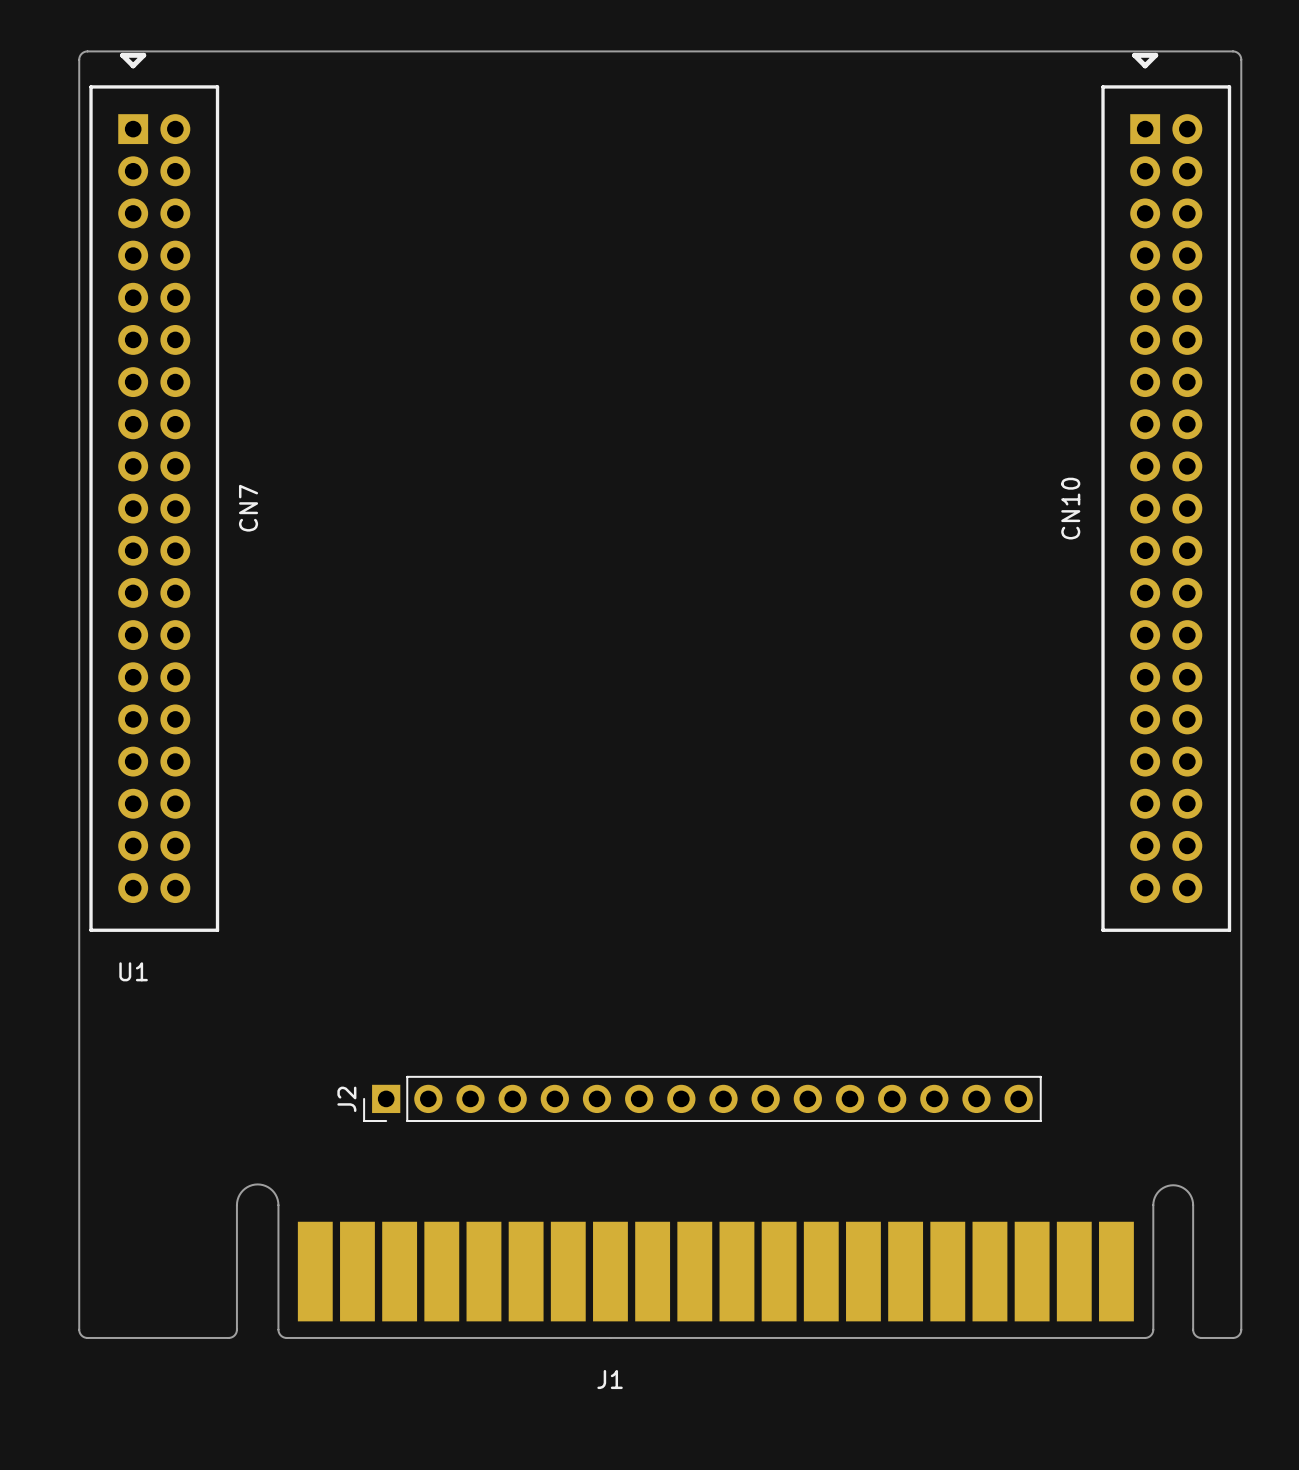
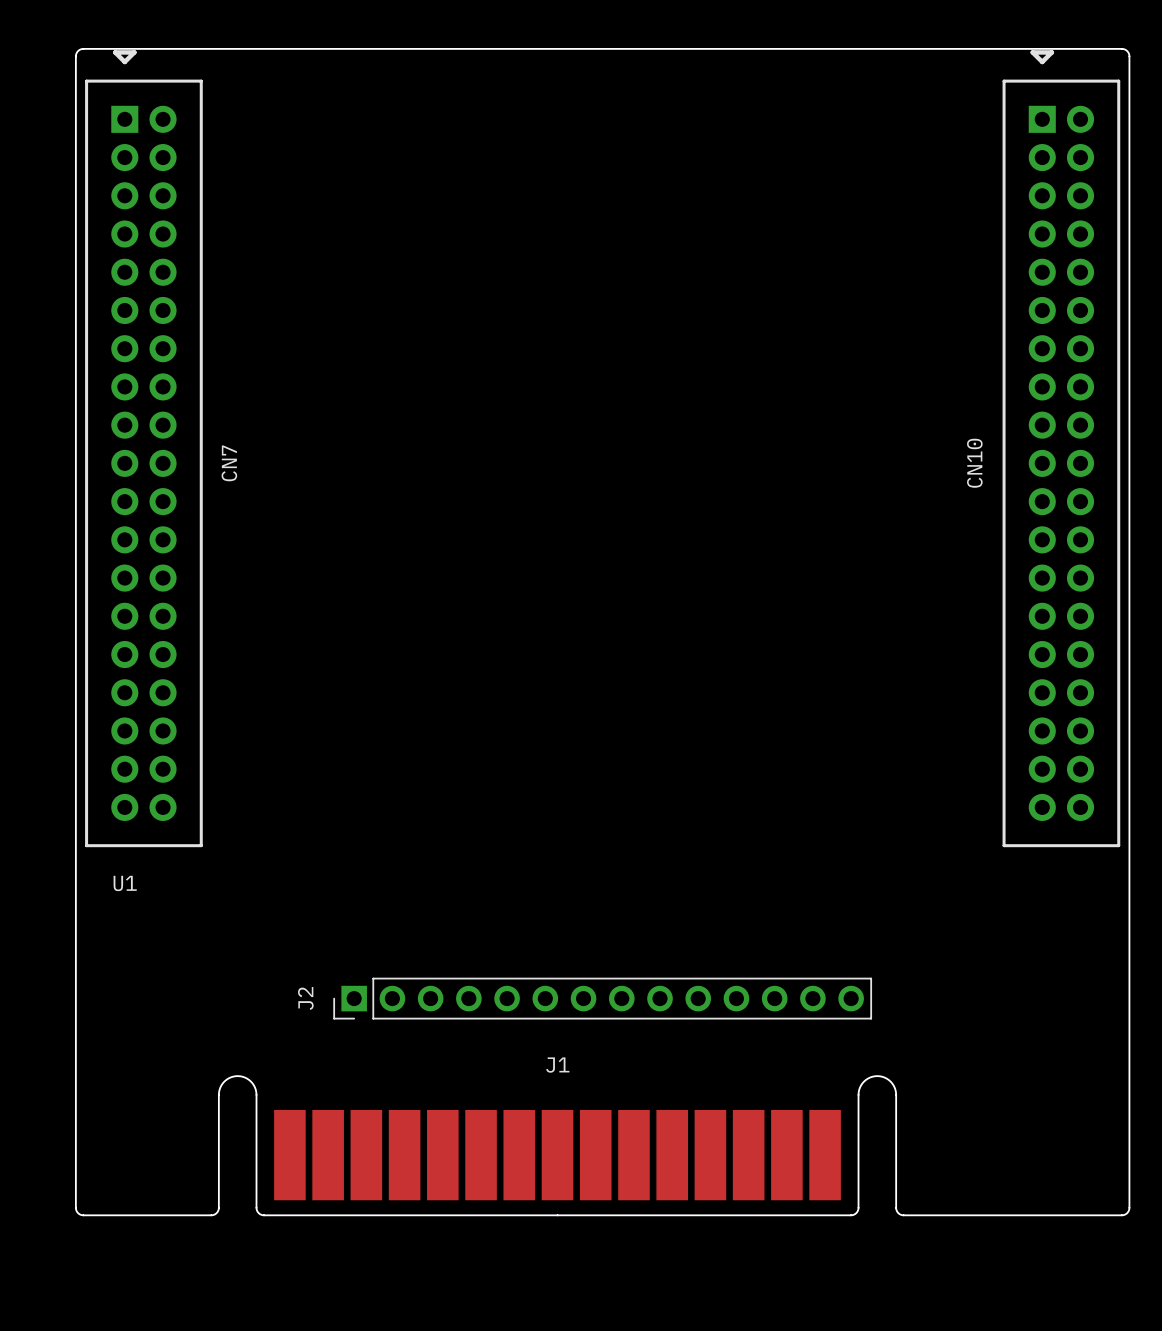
J2 footprint: [363, 1075, 1042, 1122] -> [333, 977, 873, 1020]
J1 footprint: [277, 1204, 1155, 1339] -> [255, 1094, 860, 1217]
board edge: (1153, 1205) (1157, 1193) (1163, 1187) (1170, 1185) (1183, 1187) (1191, 1197) (1193, 1330) (1195, 1335) (1201, 1337) -> (858, 1094) (864, 1081) (874, 1076) (886, 1078) (894, 1087) (896, 1207) (899, 1214) (1093, 1215)
J1 name position: J1 (610, 1379) -> J1 (557, 1065)

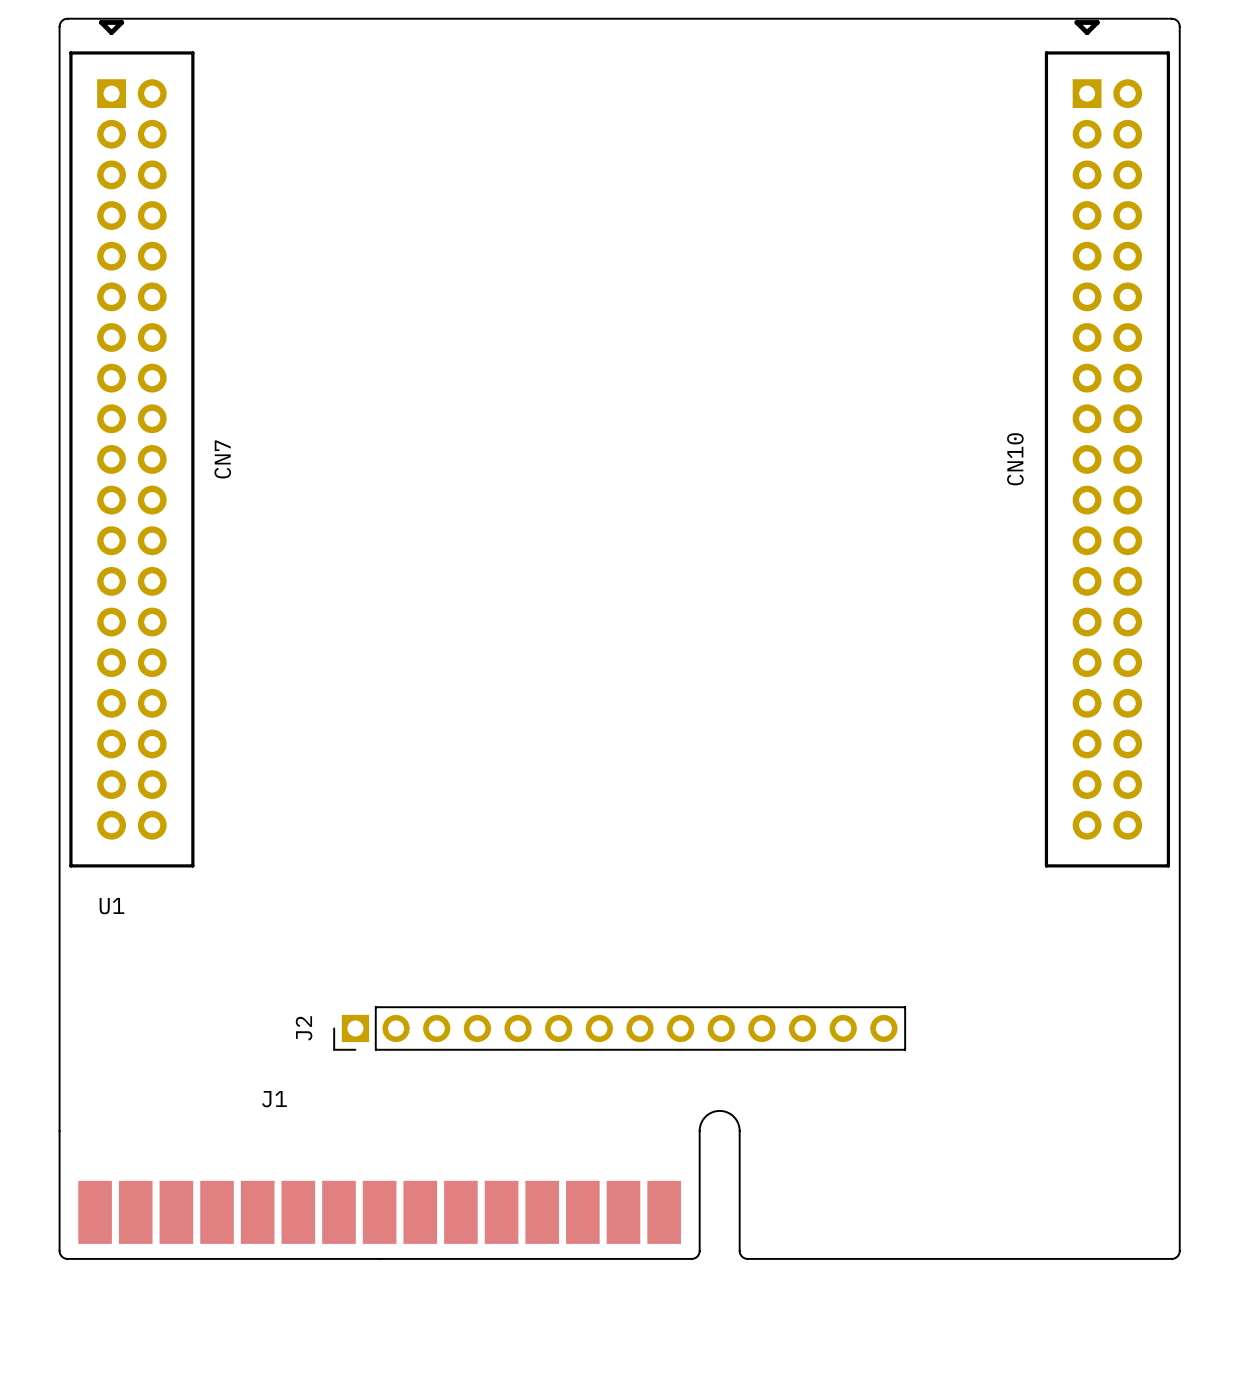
J1 name position: J1 (557, 1065) -> J1 (274, 1099)
board edge: (75, 1094) (75, 1207) (78, 1213) (83, 1215) (211, 1215) (215, 1213) (218, 1207) (220, 1087) (228, 1078) (240, 1076) (250, 1081) (256, 1094) -> none
J1 footprint: [255, 1094, 860, 1217] -> [58, 1129, 701, 1260]
board edge: (858, 1094) (864, 1081) (874, 1076) (886, 1078) (894, 1087) (896, 1208) (898, 1213) (903, 1215) -> (699, 1130) (701, 1123) (705, 1116) (717, 1111) (729, 1113) (738, 1123) (739, 1250) (743, 1257) (939, 1258)

